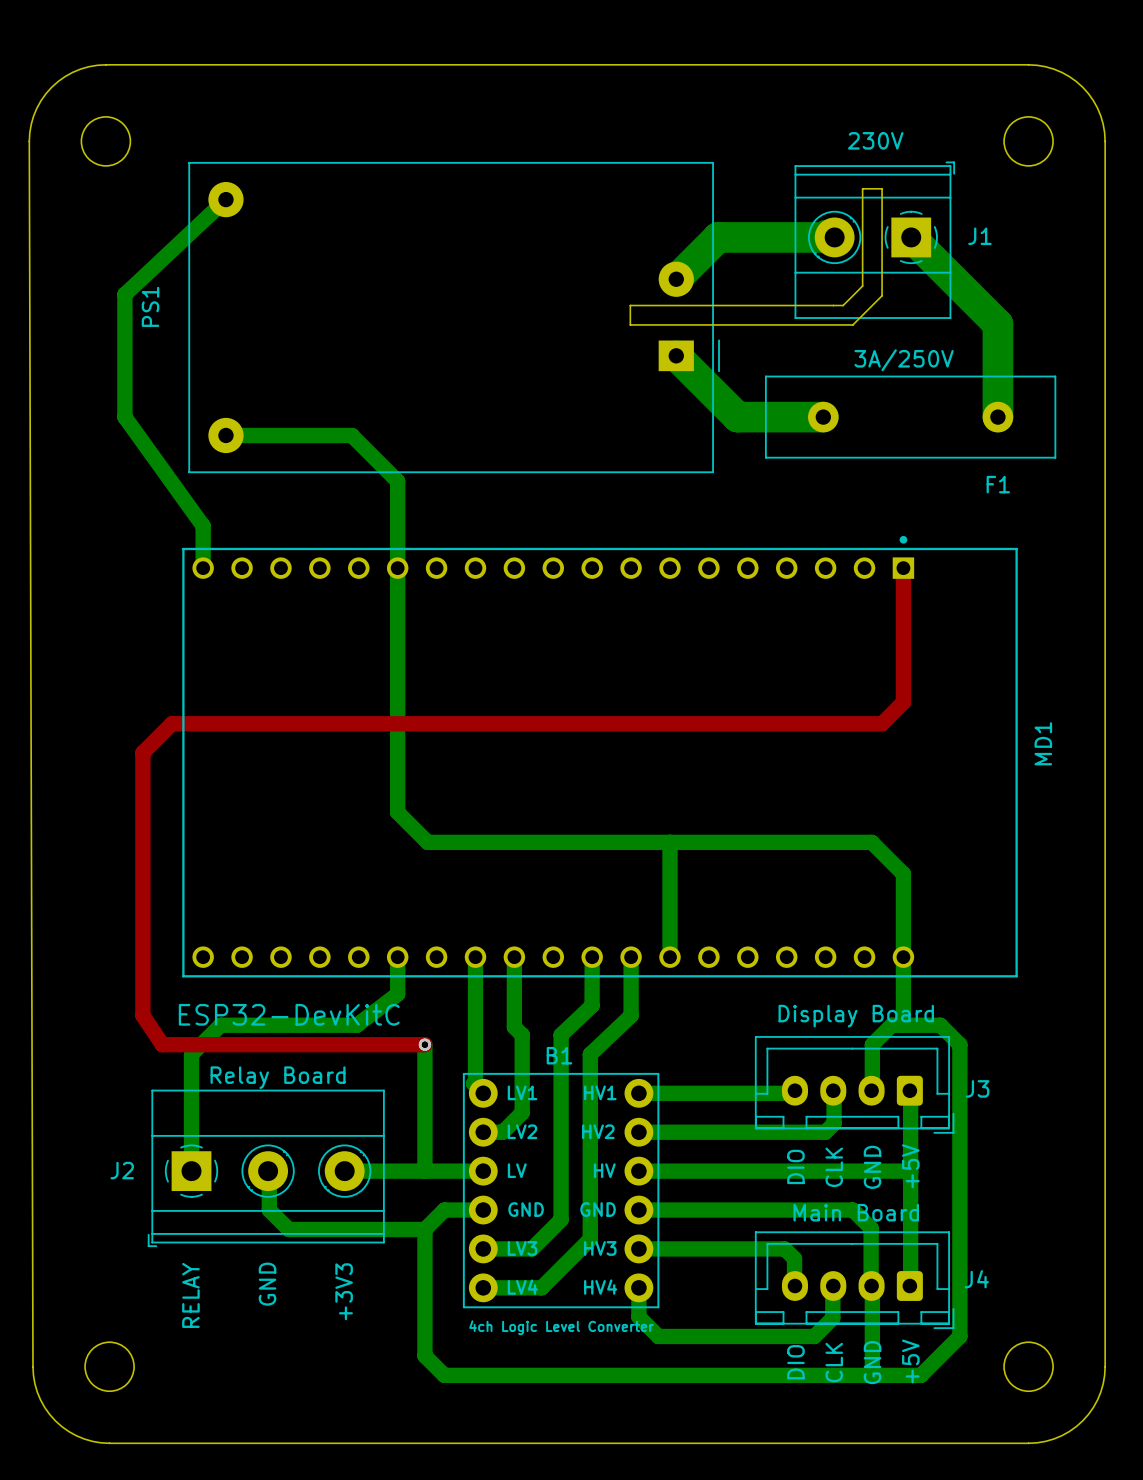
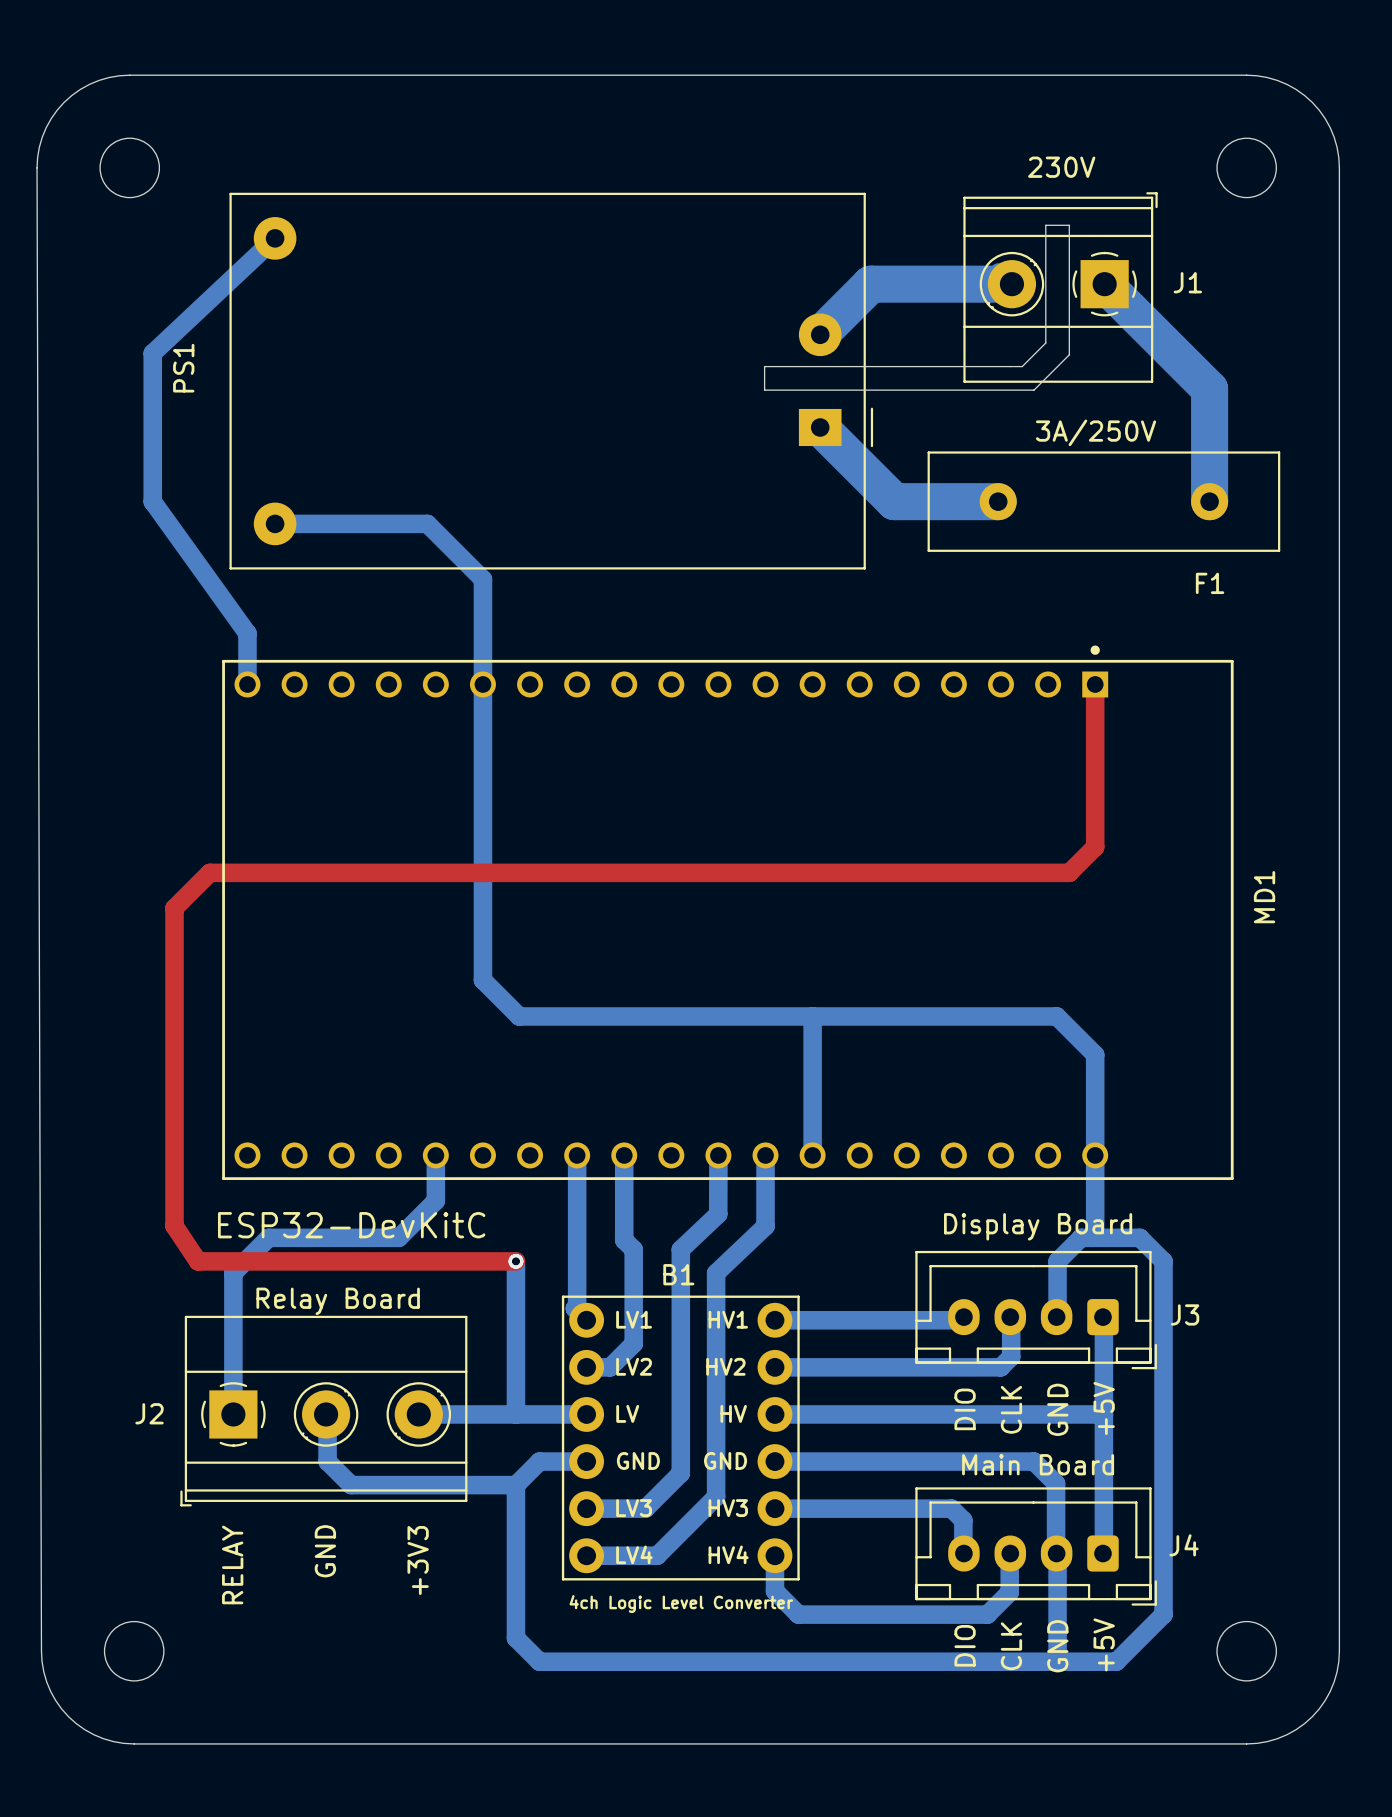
bottom track: (397, 957) (397, 994) (356, 1025) (328, 1025) -> (435, 1155) (435, 1200) (398, 1237)

